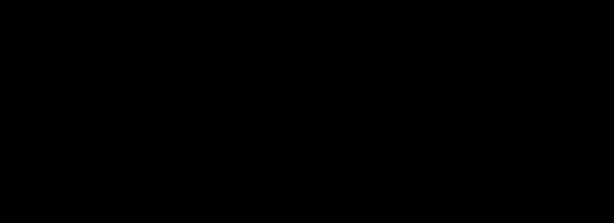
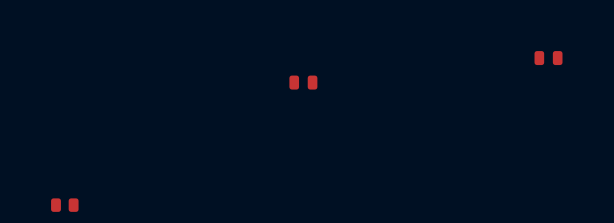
part: none -> (548, 58)
part: none -> (303, 82)
part: none -> (64, 205)

